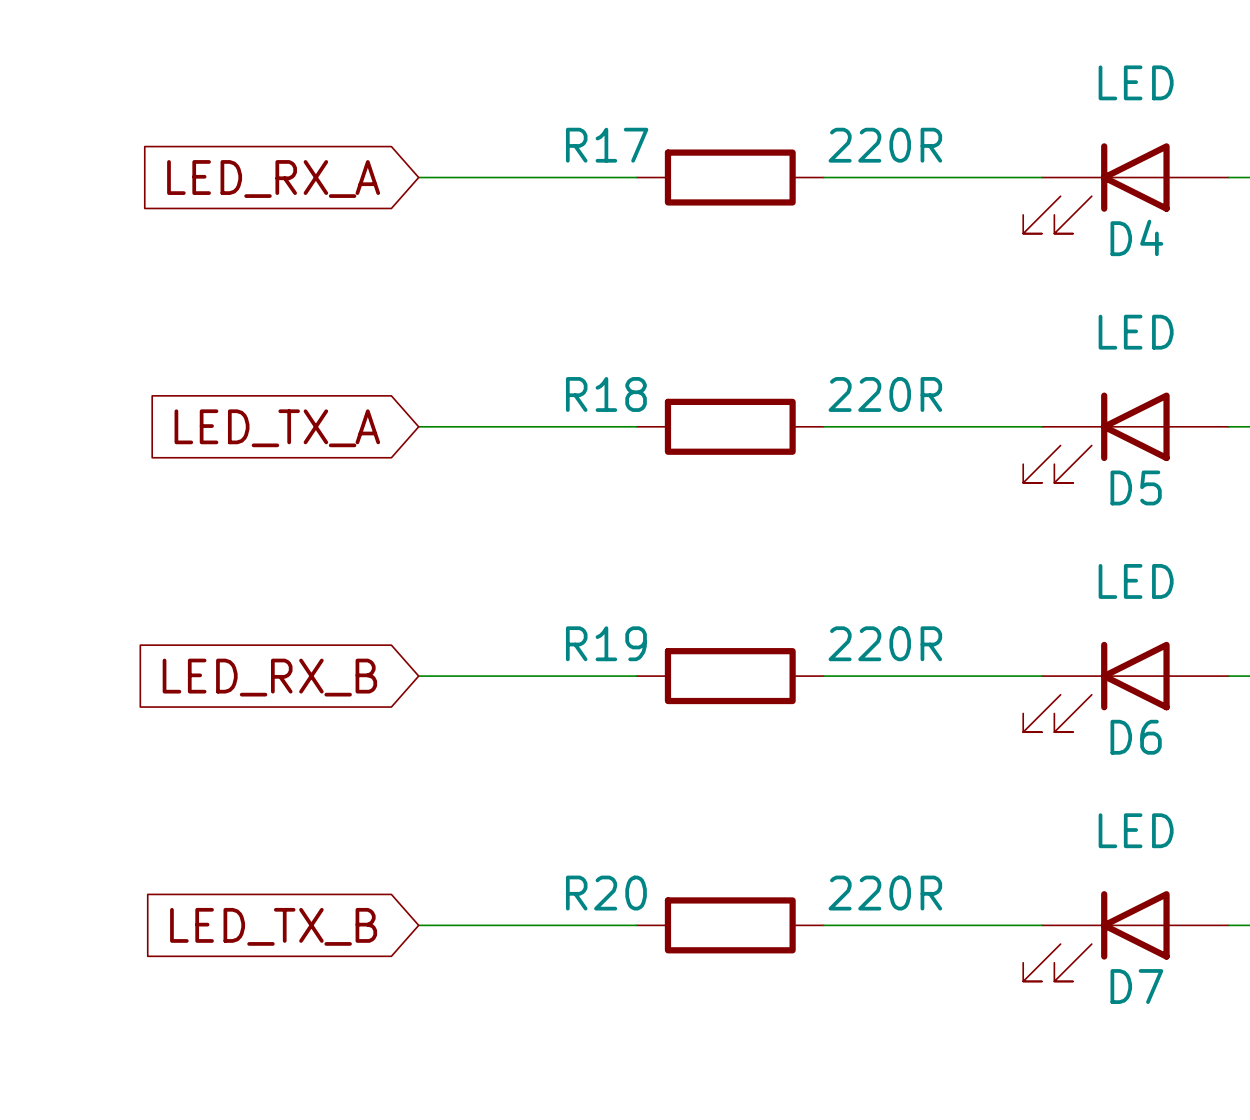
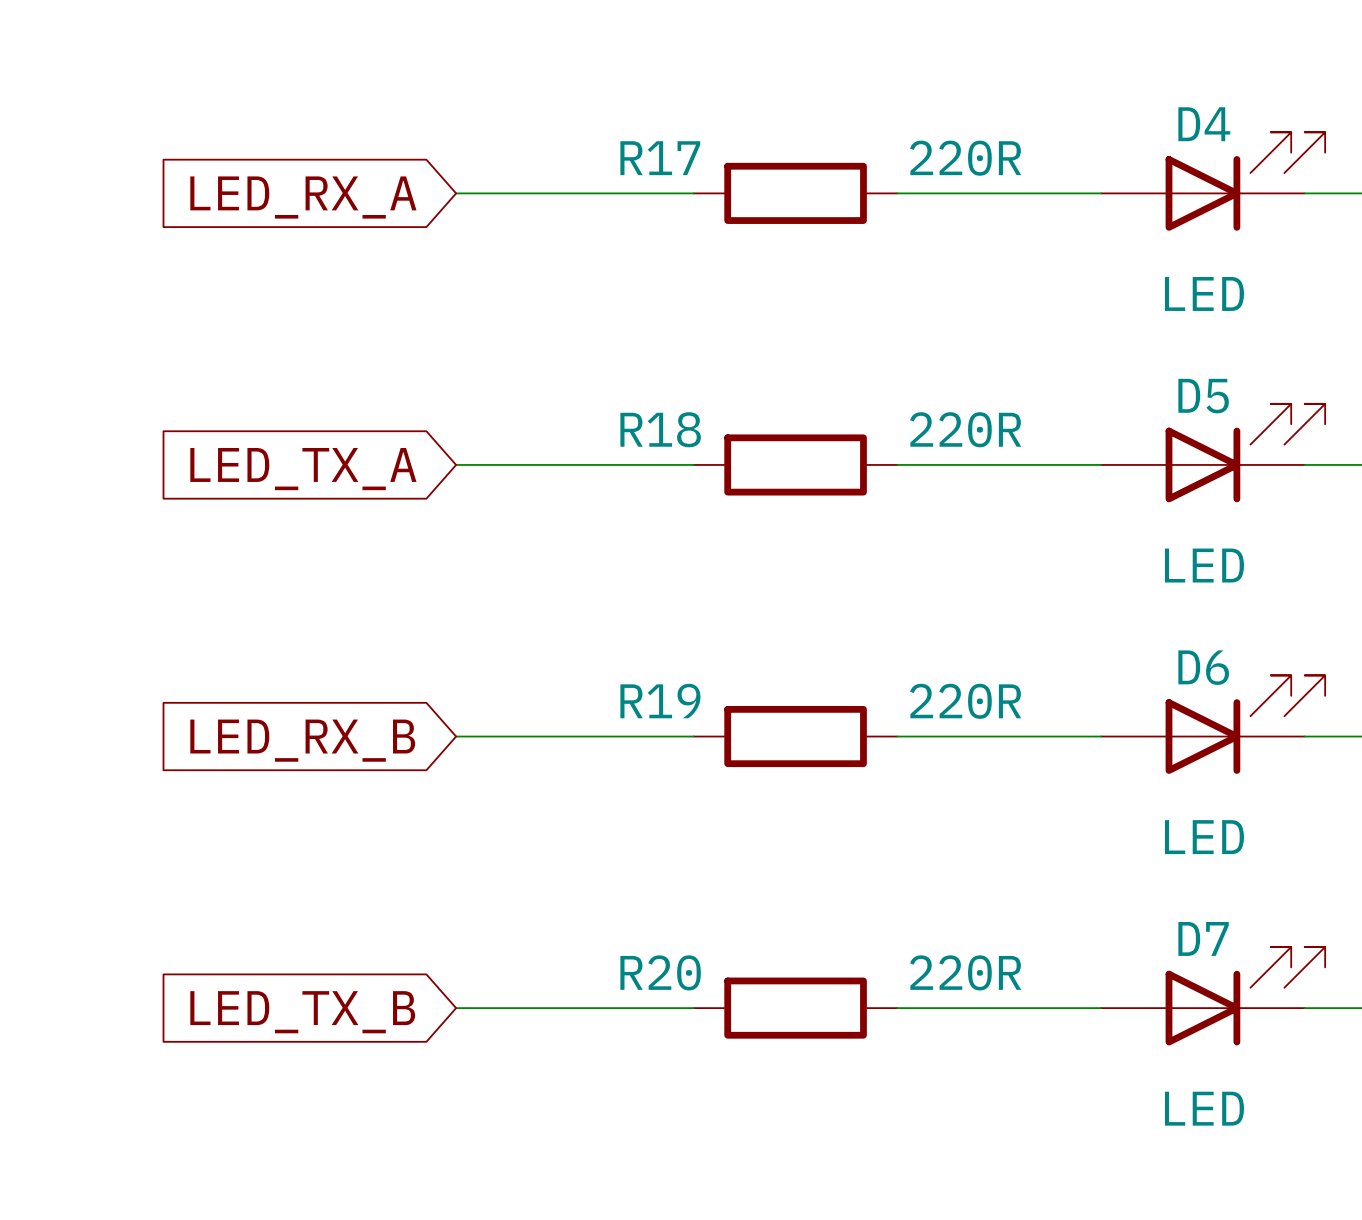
D4 rotation: 0° (1096, 188) -> 180° (1245, 181)
D5 rotation: 0° (1096, 437) -> 180° (1245, 453)
D6 rotation: 0° (1096, 687) -> 180° (1245, 724)
D7 rotation: 0° (1096, 936) -> 180° (1245, 996)

